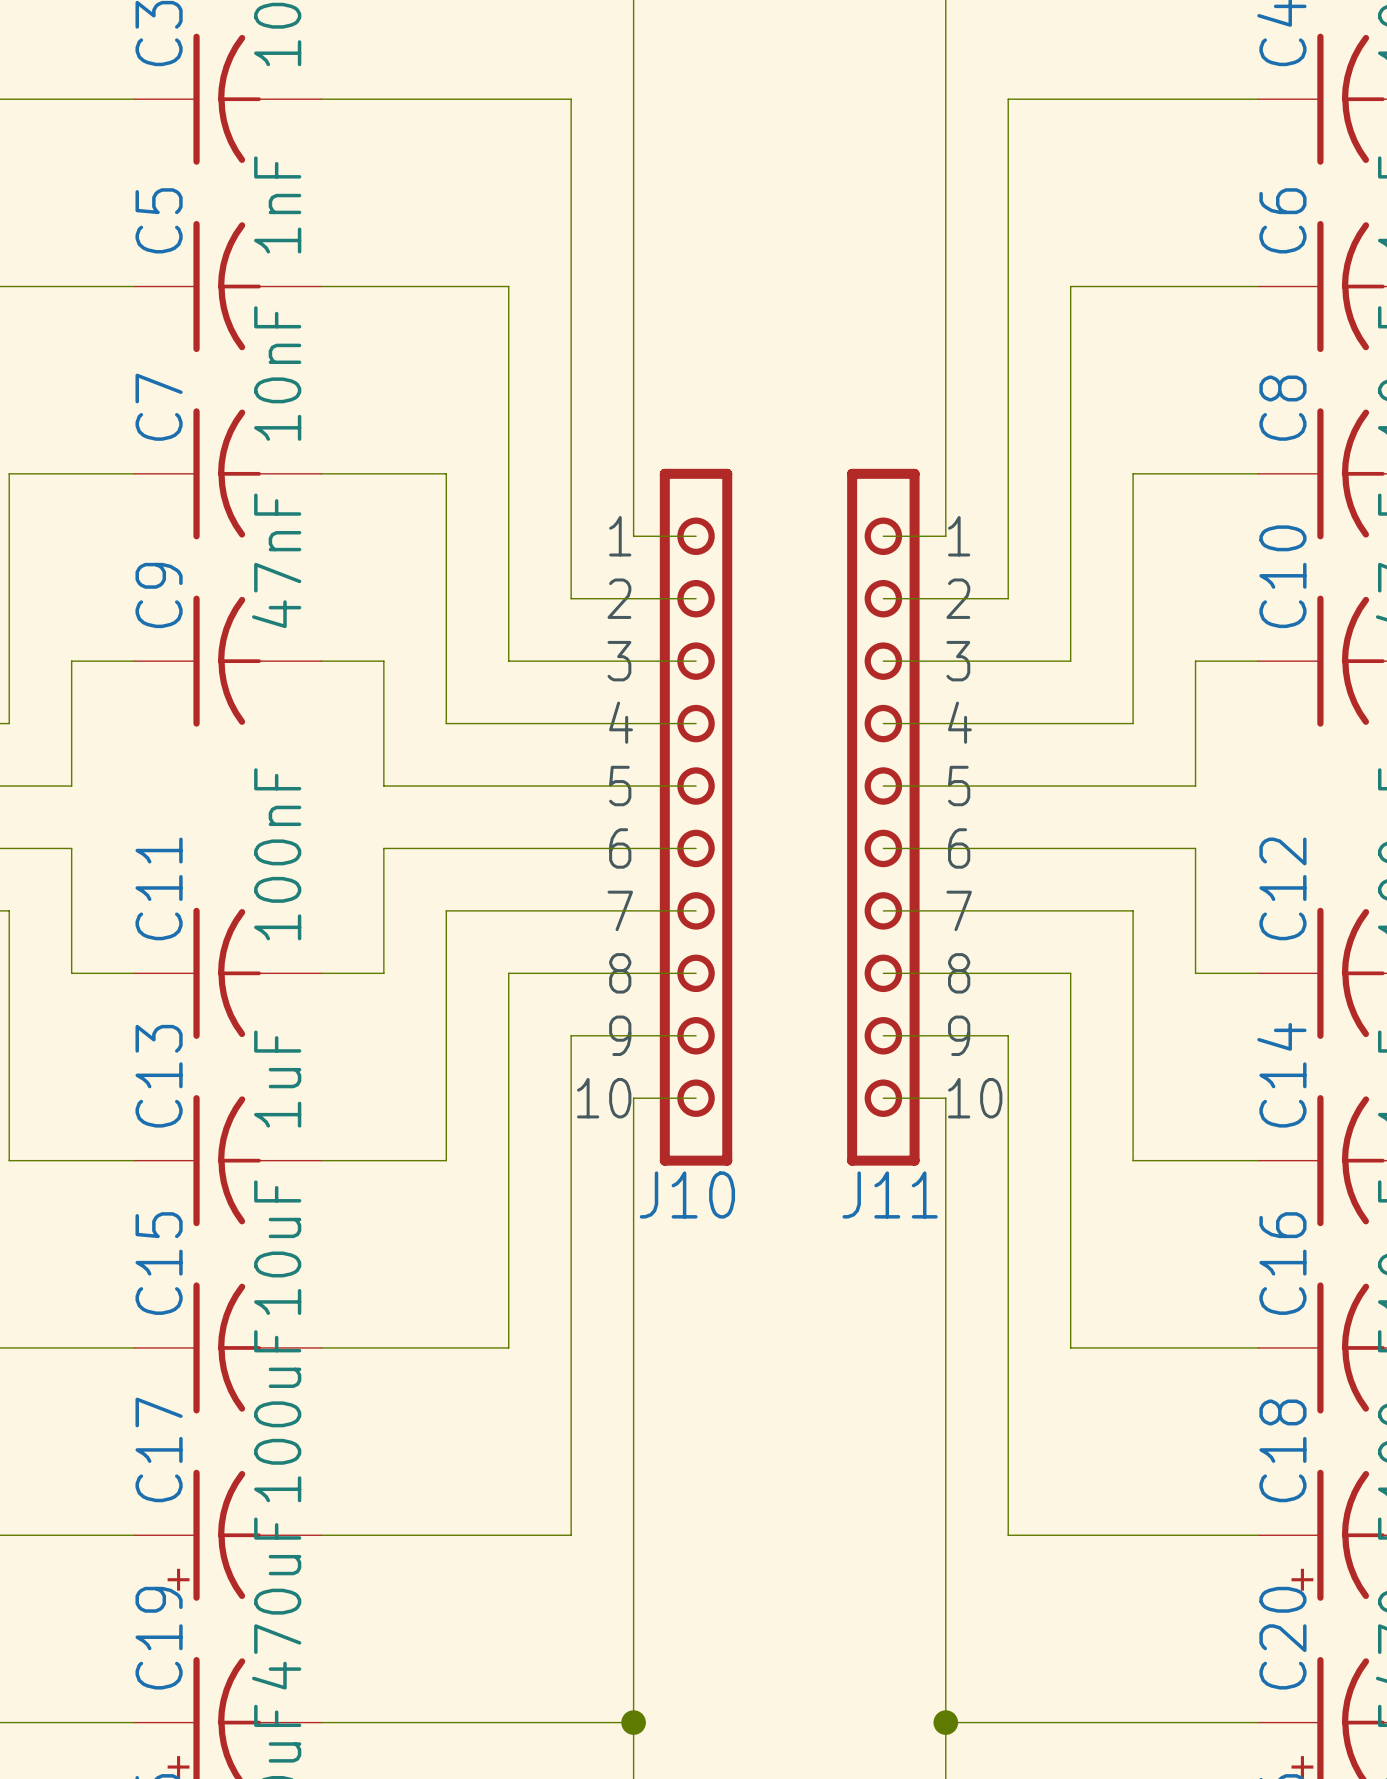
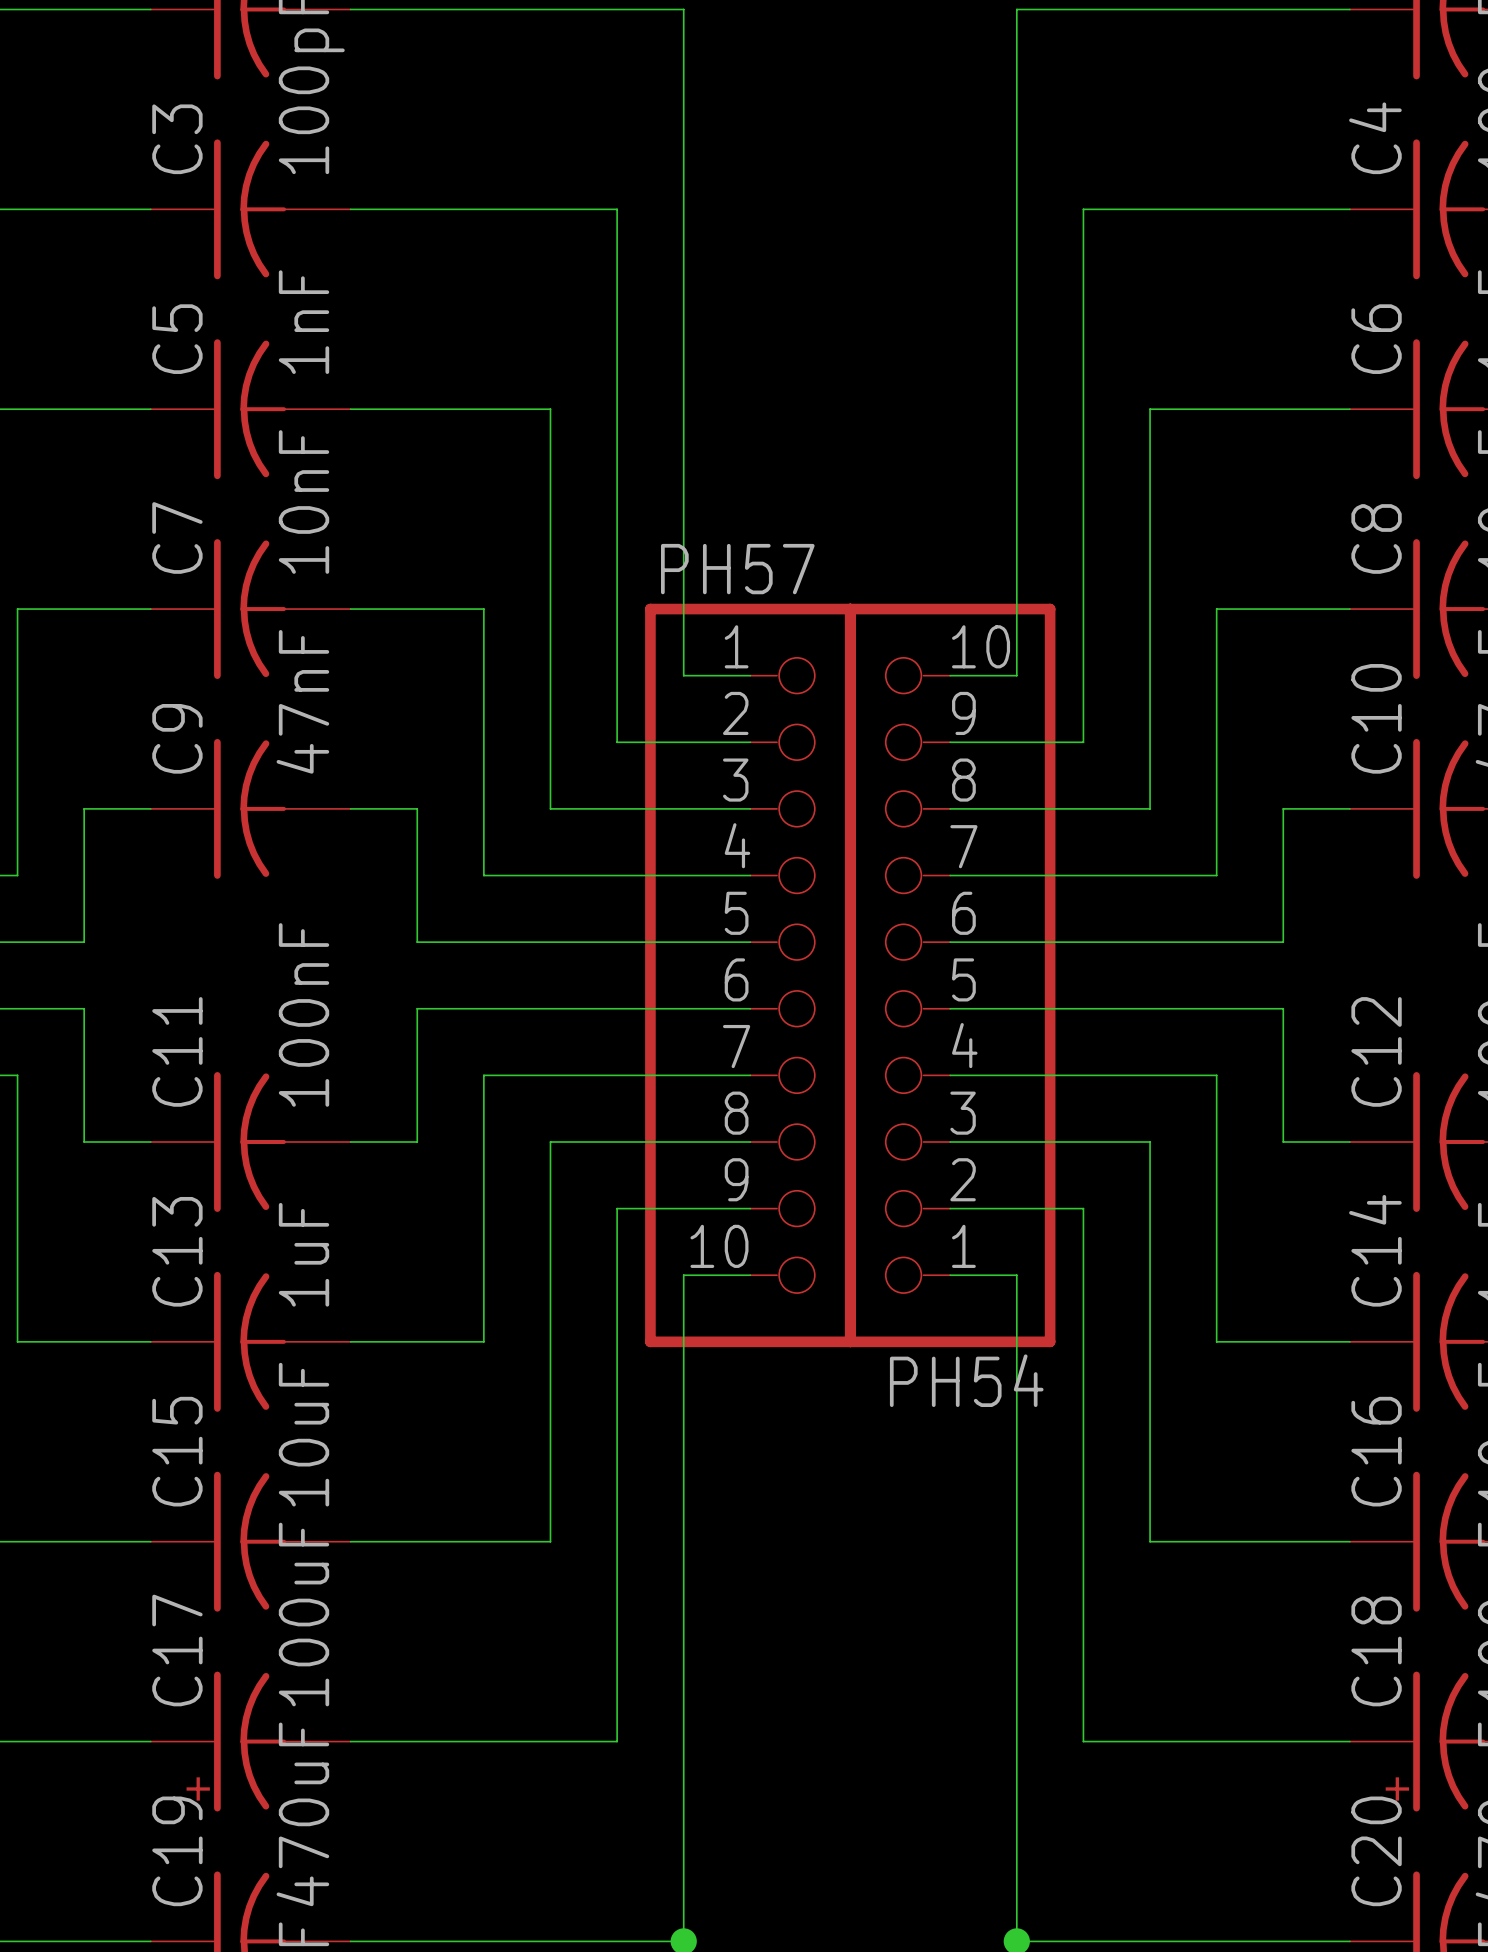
J10: (696, 817) -> none
PH57: none -> (750, 975)
J11: (883, 817) -> none
PH54: none -> (950, 975)

